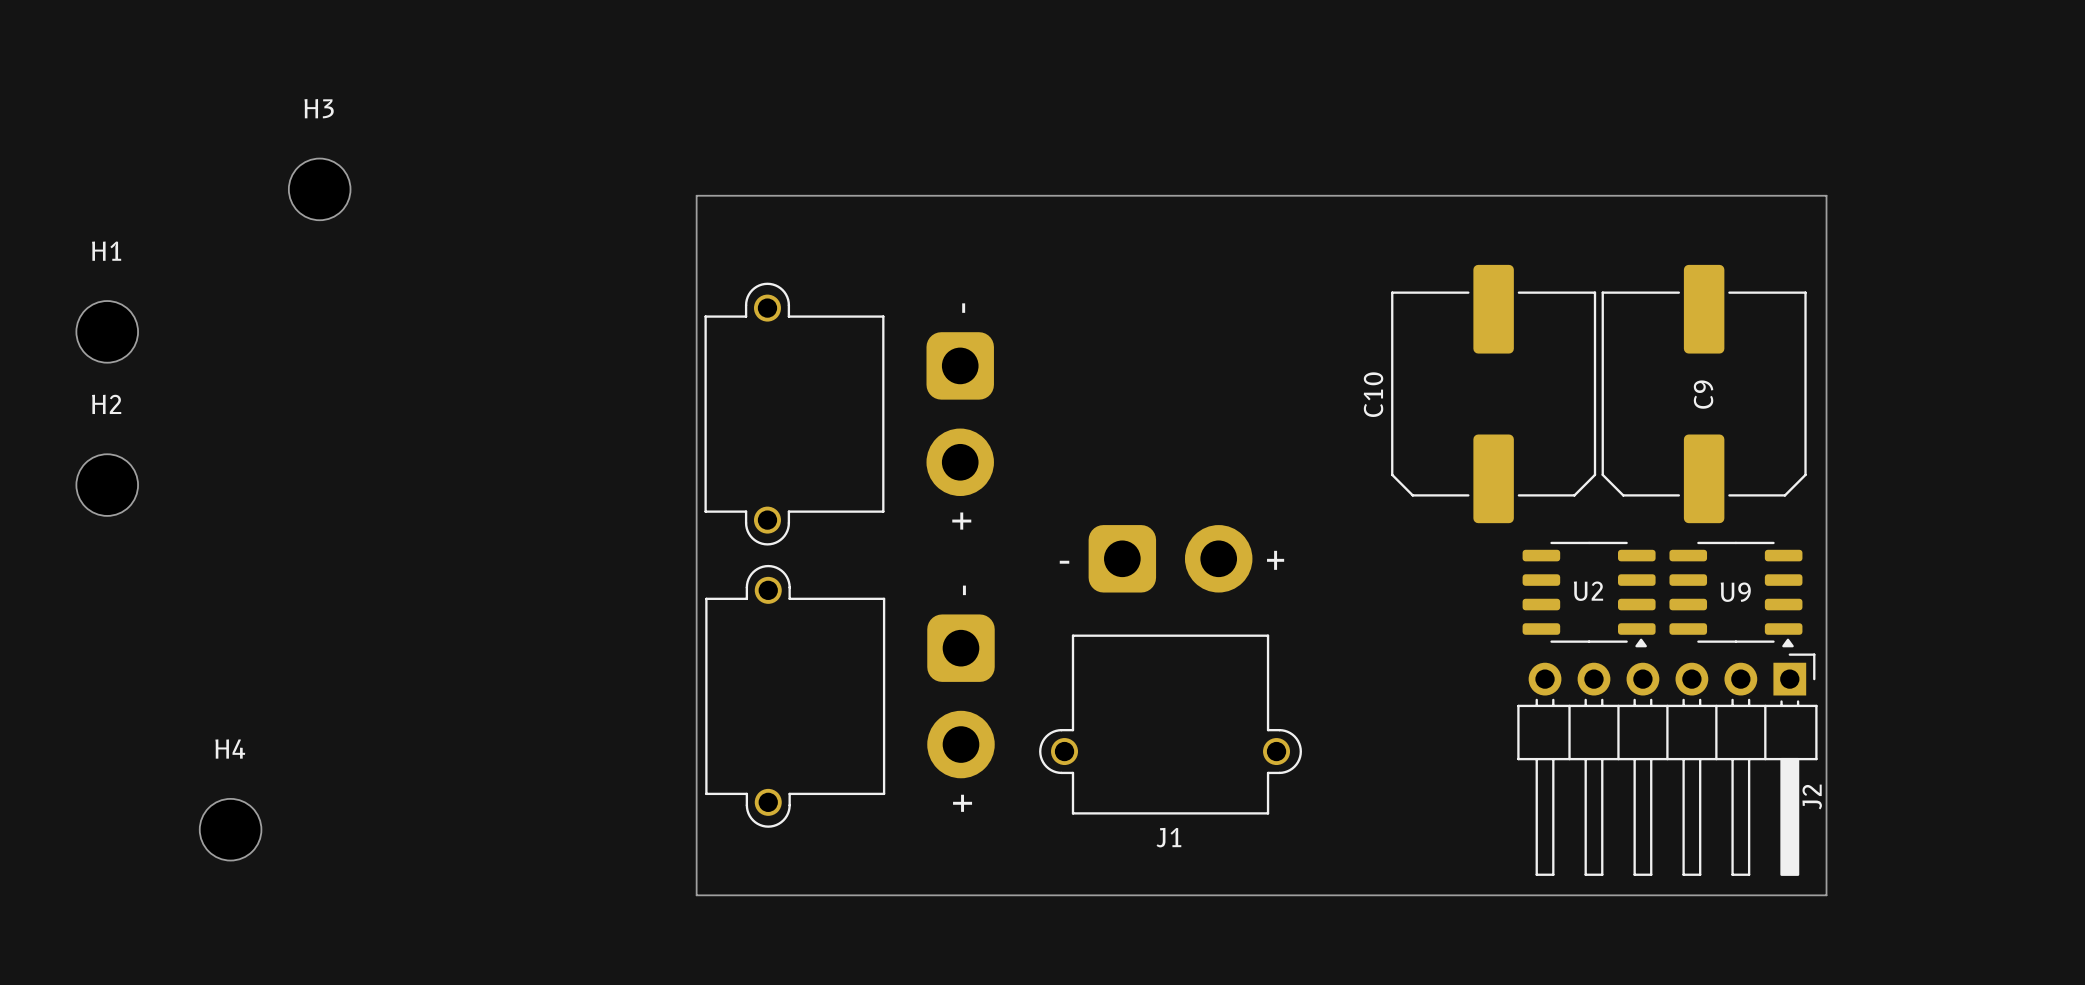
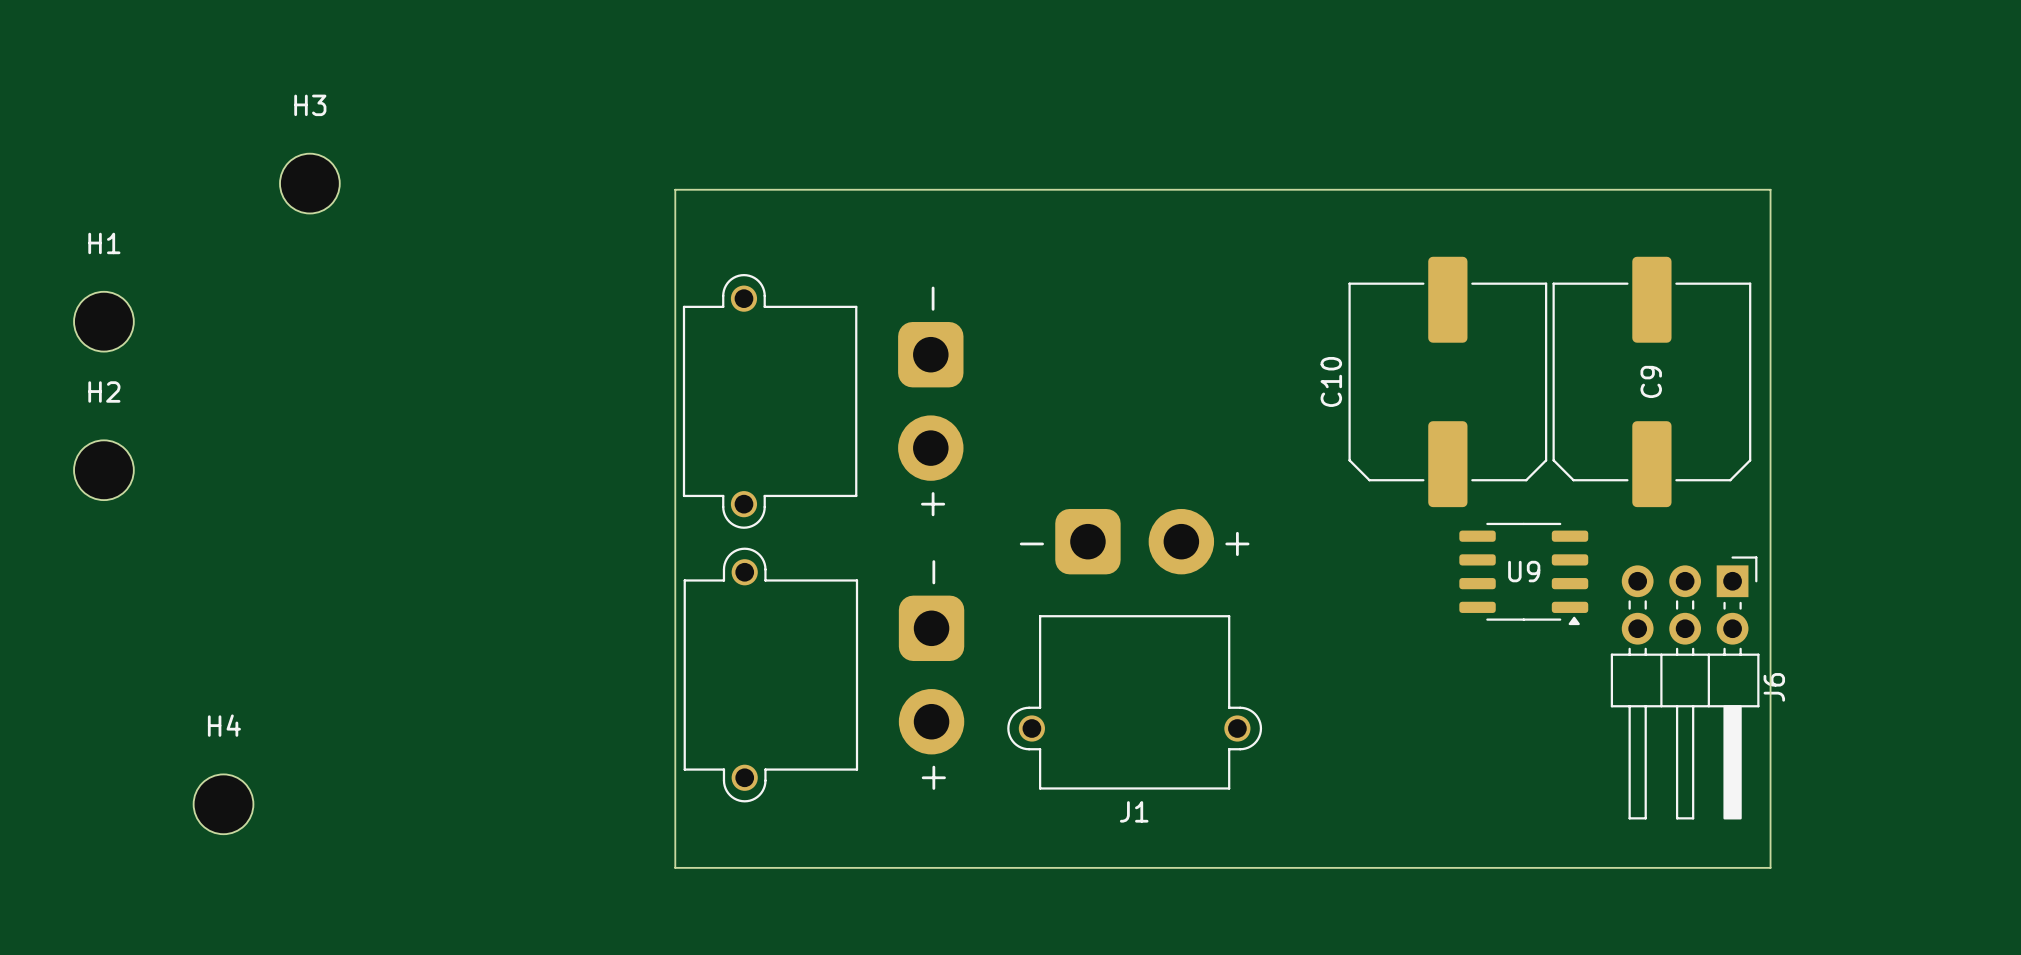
U2: (1589, 594) -> none
U9 position: (1735, 594) -> (1523, 573)
J6: none -> (1685, 687)
J2: (1667, 764) -> none

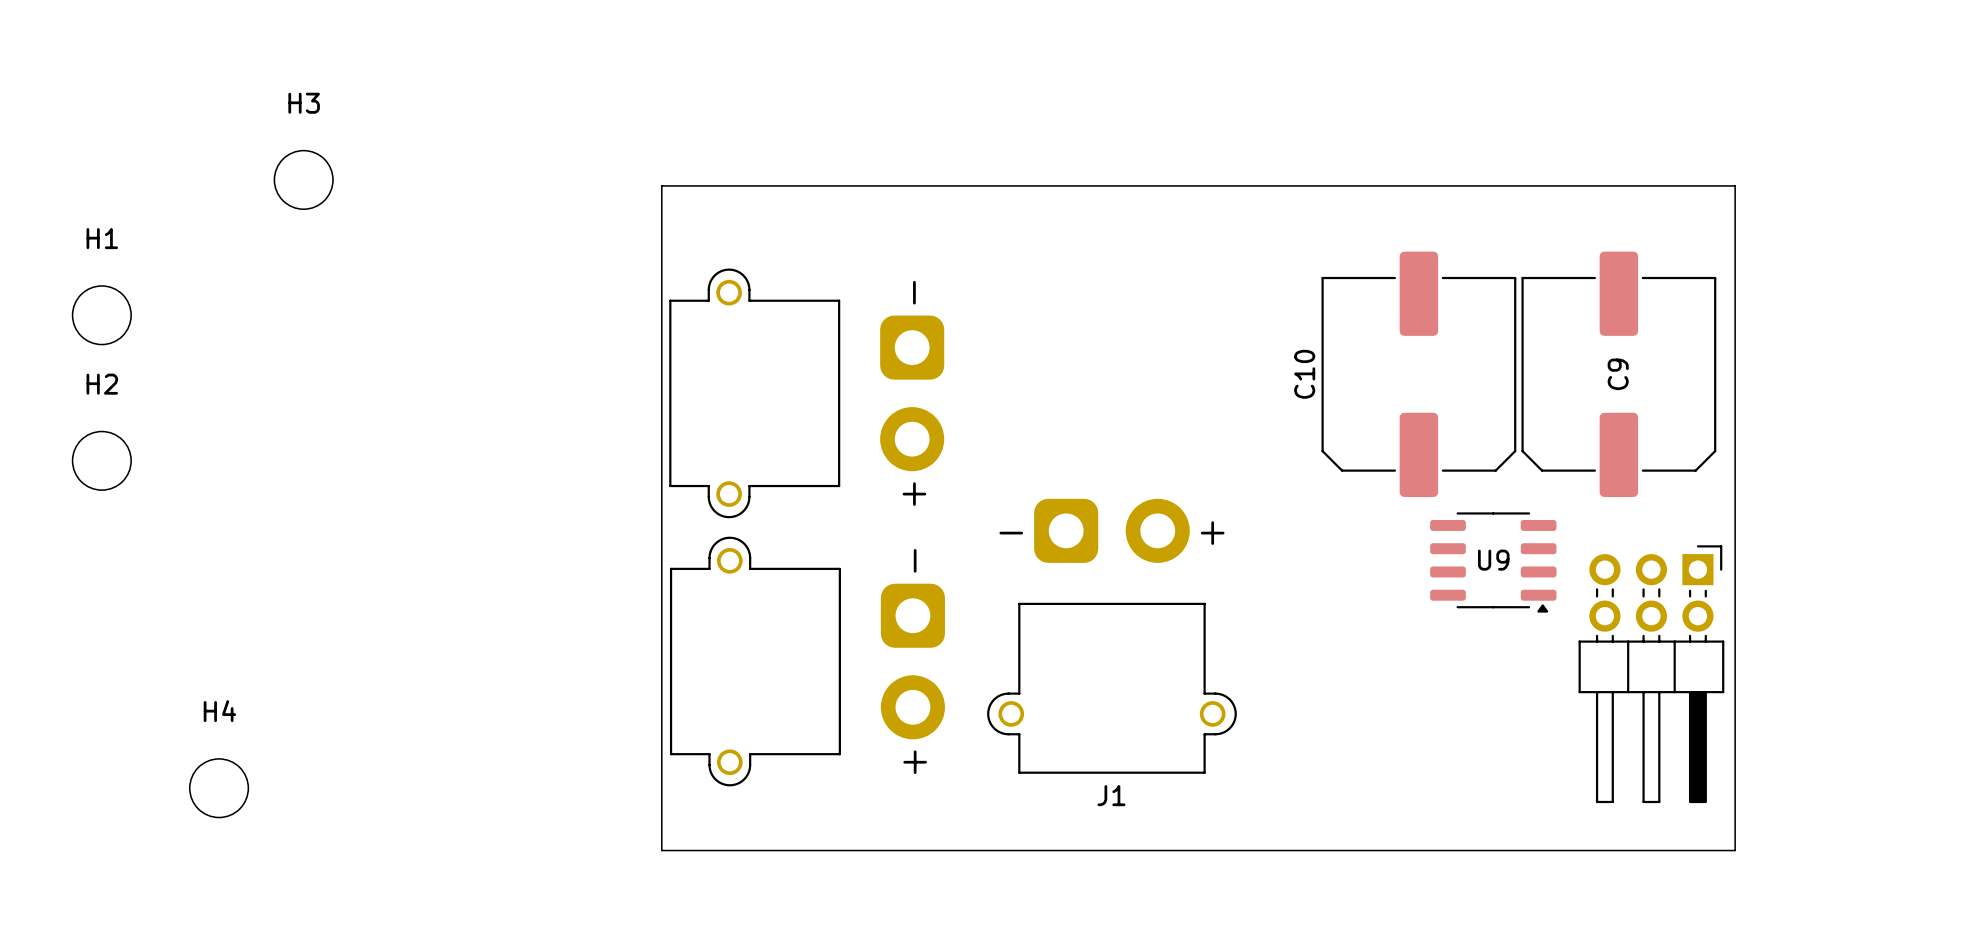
J6 name: J6 (1774, 687) -> none

